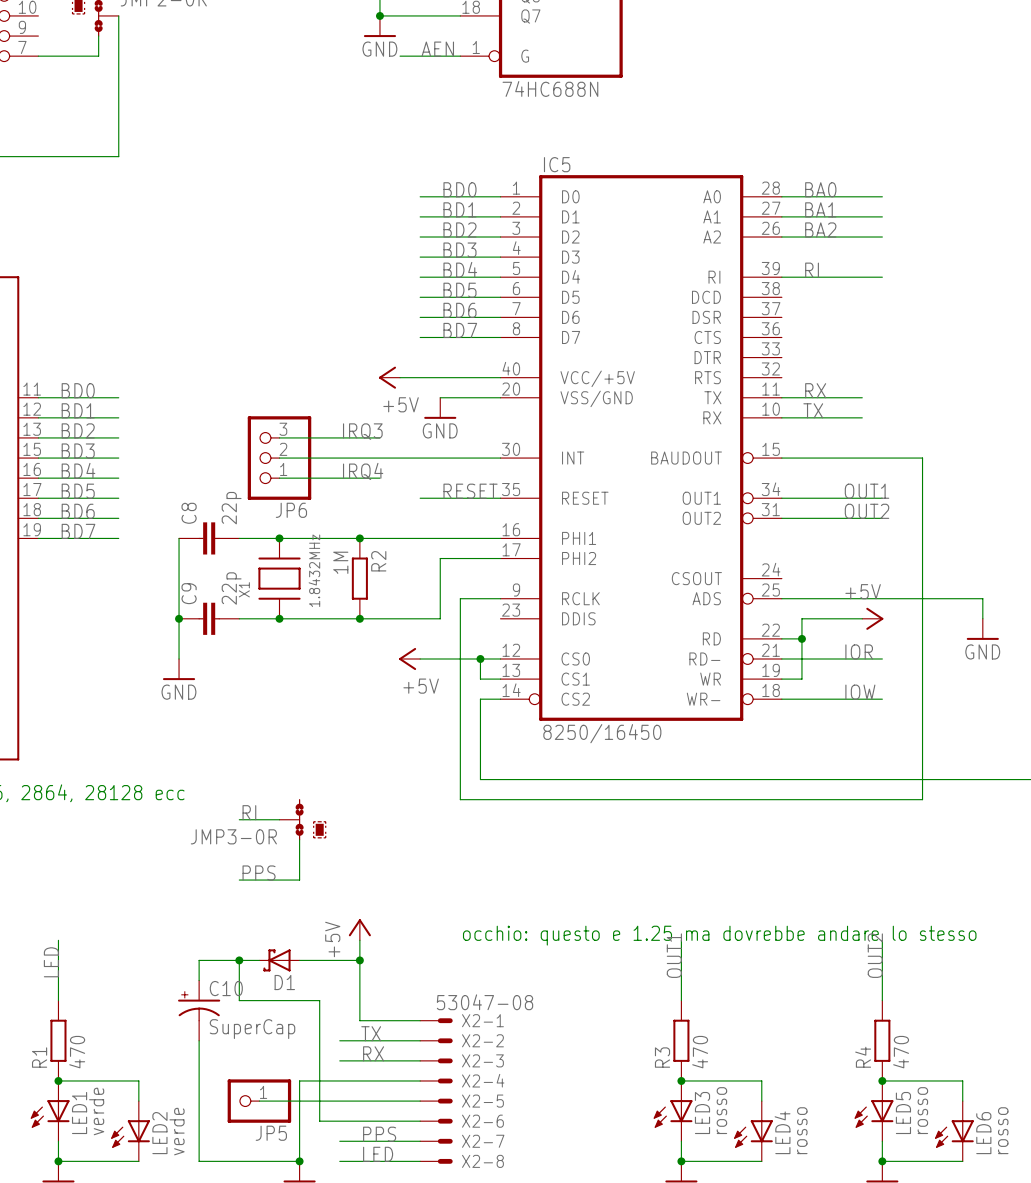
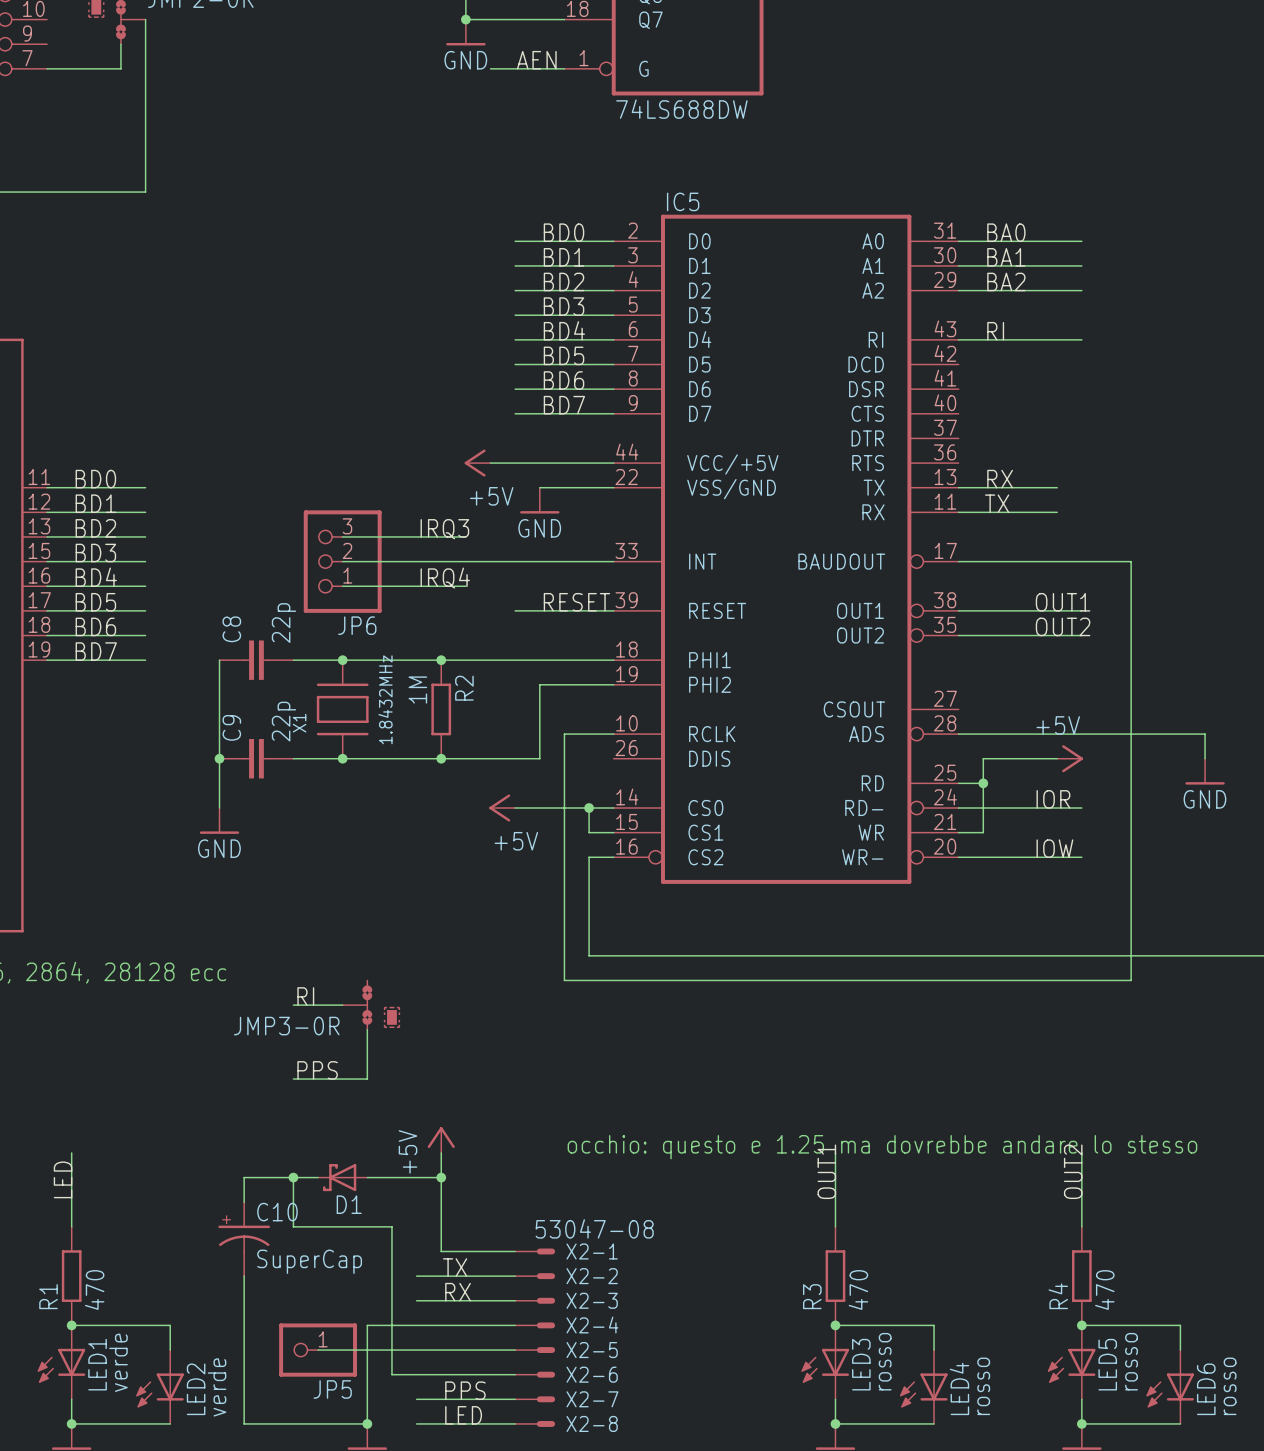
part value: 74HC688N (550, 88) -> 74LS688DW (681, 109)
IC5 symbol: [500, 175, 782, 721] -> [613, 214, 959, 884]
IC5 value: 8250/16450 (602, 733) -> none

